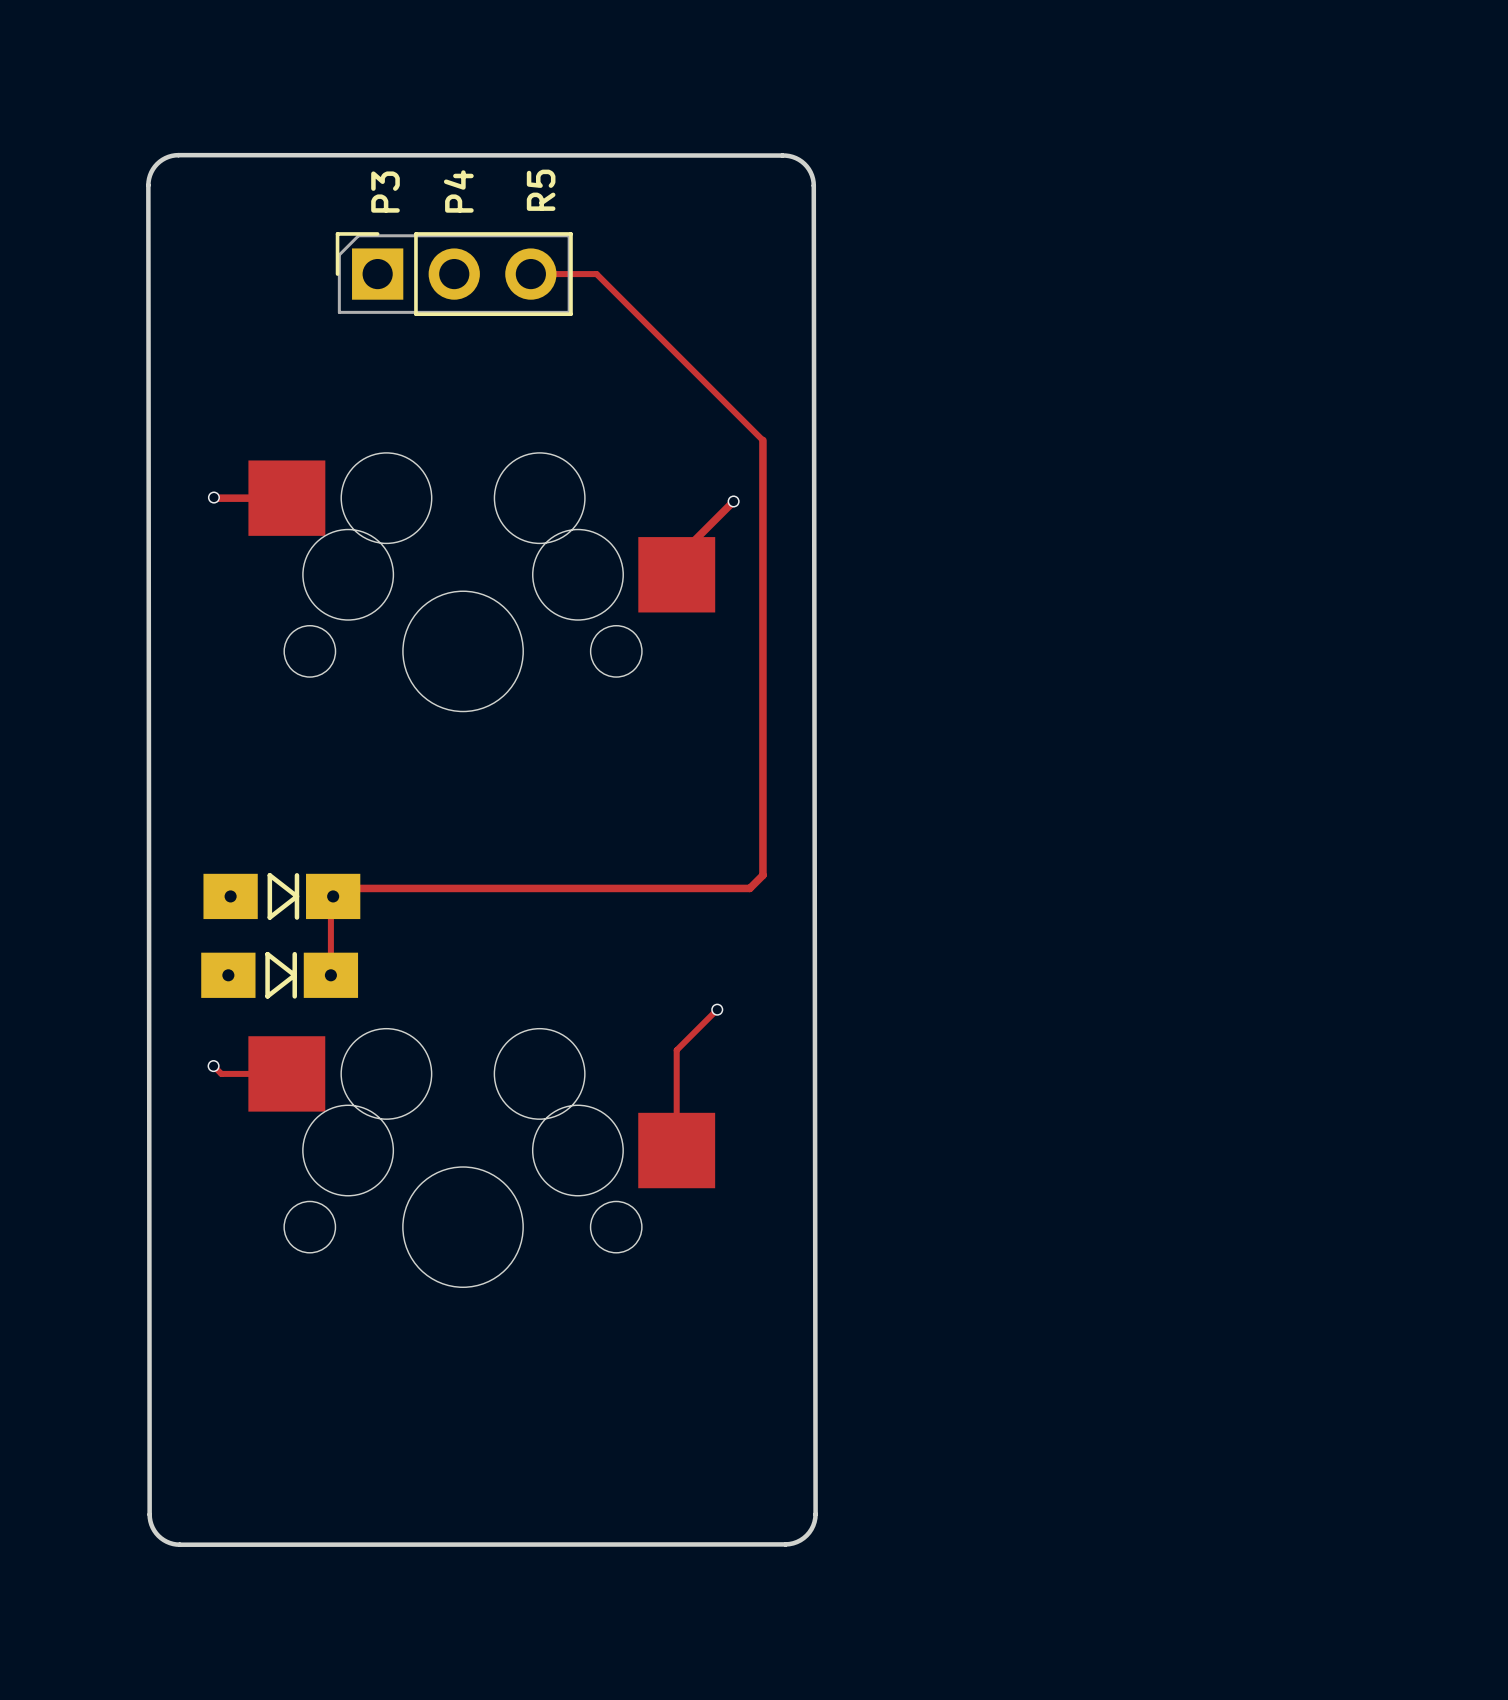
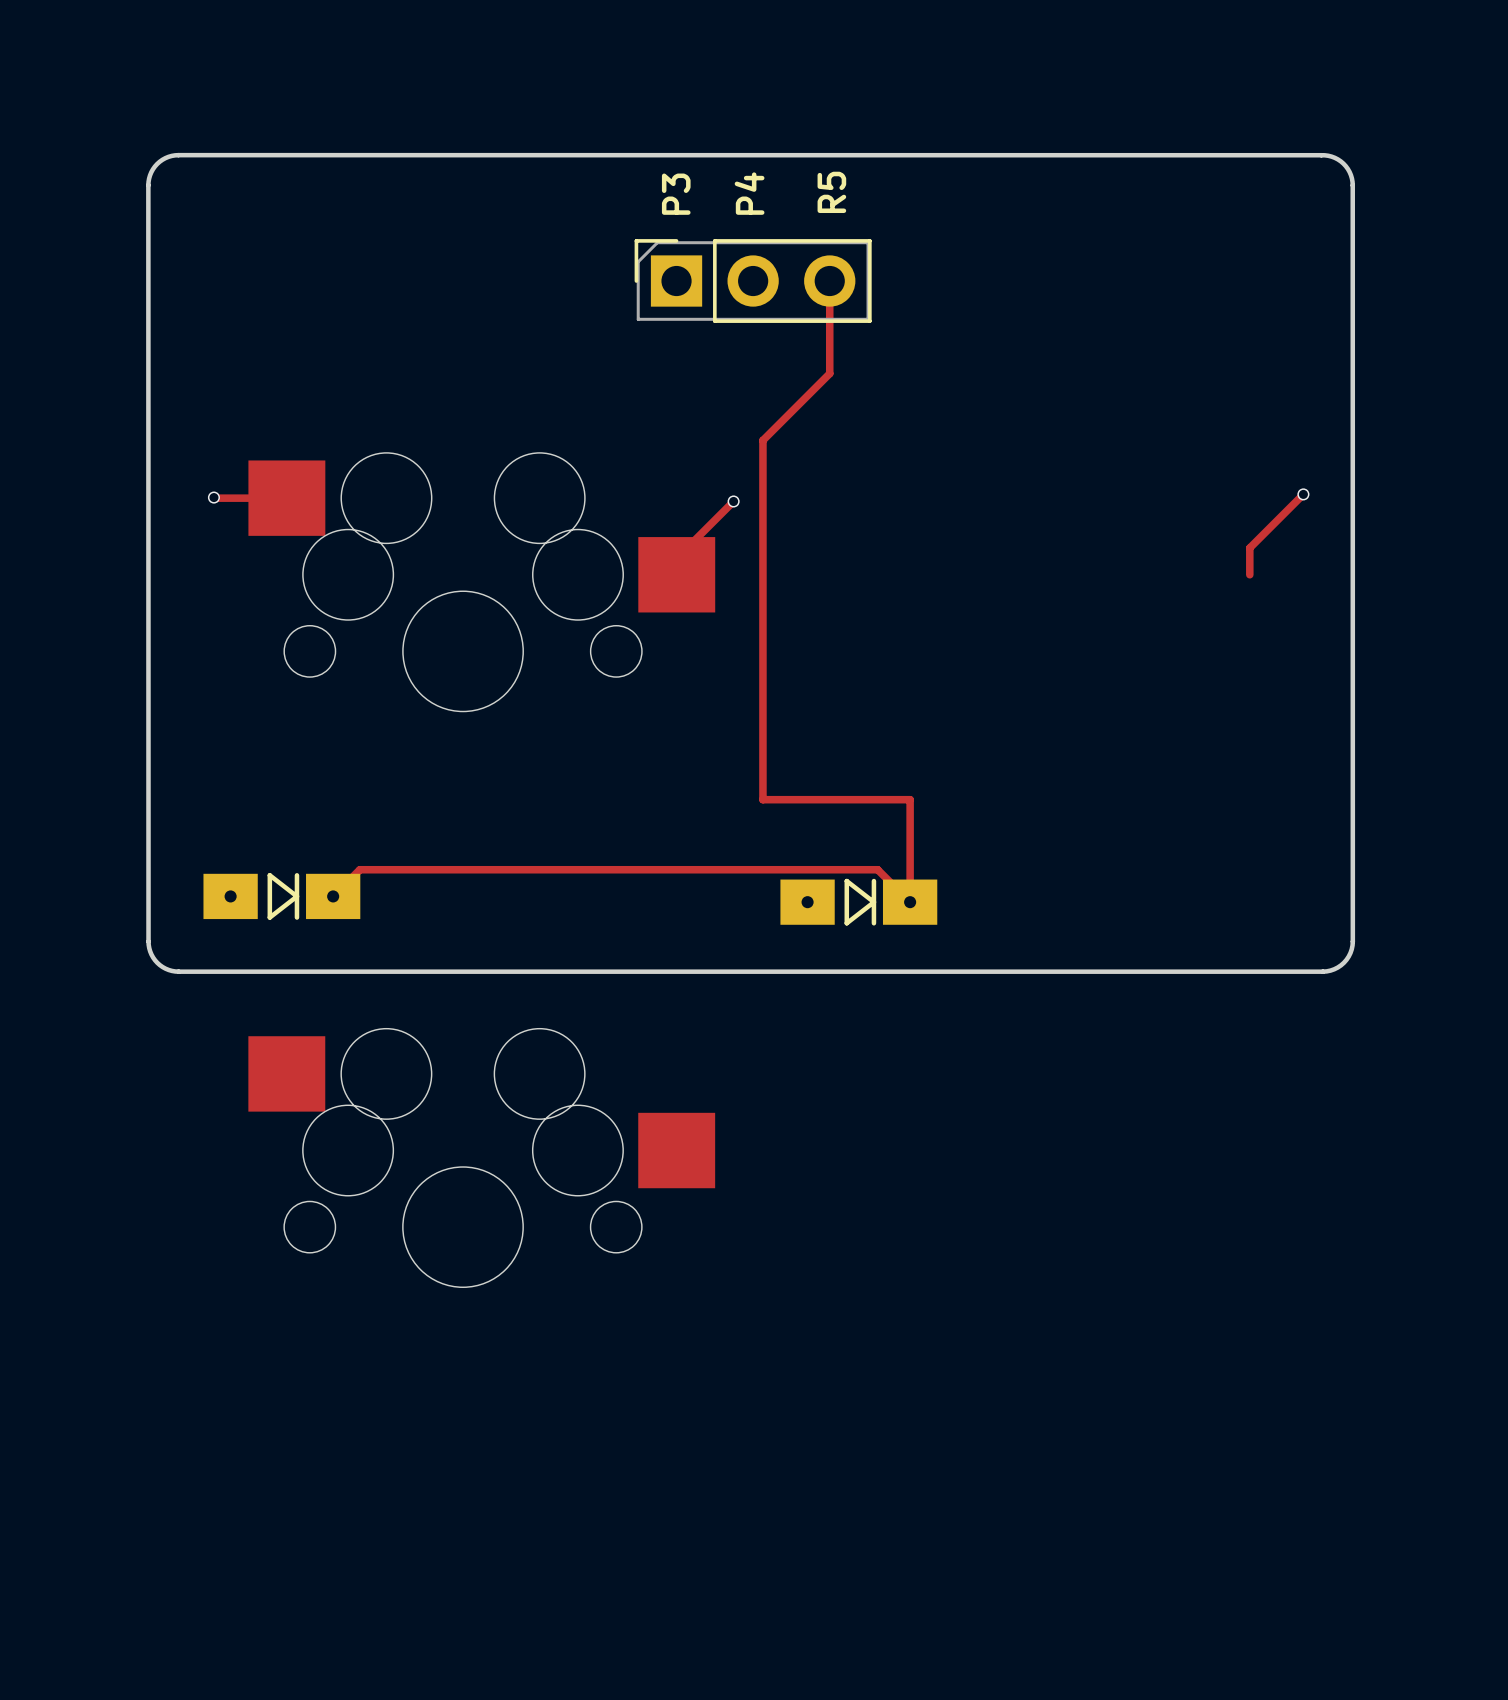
board edge: (178, 155) (785, 155) (801, 161) (810, 172) (813, 185) (815, 1514) (811, 1529) (806, 1535) (797, 1542) (785, 1544) (179, 1544) (163, 1540) (152, 1527) (149, 1514) (148, 185) -> (178, 155) (1321, 155) (1331, 156) (1340, 161) (1349, 172) (1352, 185) (1352, 941) (1350, 952) (1346, 959) (1334, 969) (1322, 971) (178, 971) (162, 967) (153, 957) (148, 941) (148, 185)
text position: R5 (541, 190) -> R5 (831, 192)
text position: P4 (458, 191) -> P4 (749, 193)
text position: P3 (385, 192) -> P3 (676, 194)
part position: (454, 274) -> (753, 281)
track: (530, 274) (596, 274) (762, 440) -> (829, 281) (829, 373) (762, 440)
track: none -> (1303, 494) (1249, 548) (1249, 574)
via: none -> (1303, 494)
track: (762, 799) (762, 875) (749, 888) (341, 888) -> (910, 902) (877, 869) (359, 869) (341, 888)
track: none -> (762, 799) (910, 799) (910, 902)
track: (333, 896) (330, 898) (330, 975) -> none
part position: (279, 975) -> (858, 902)
track: (717, 1009) (676, 1050) (676, 1150) -> none
via: (717, 1009) -> none
track: (213, 1066) (221, 1073) (286, 1073) -> none
via: (213, 1066) -> none

